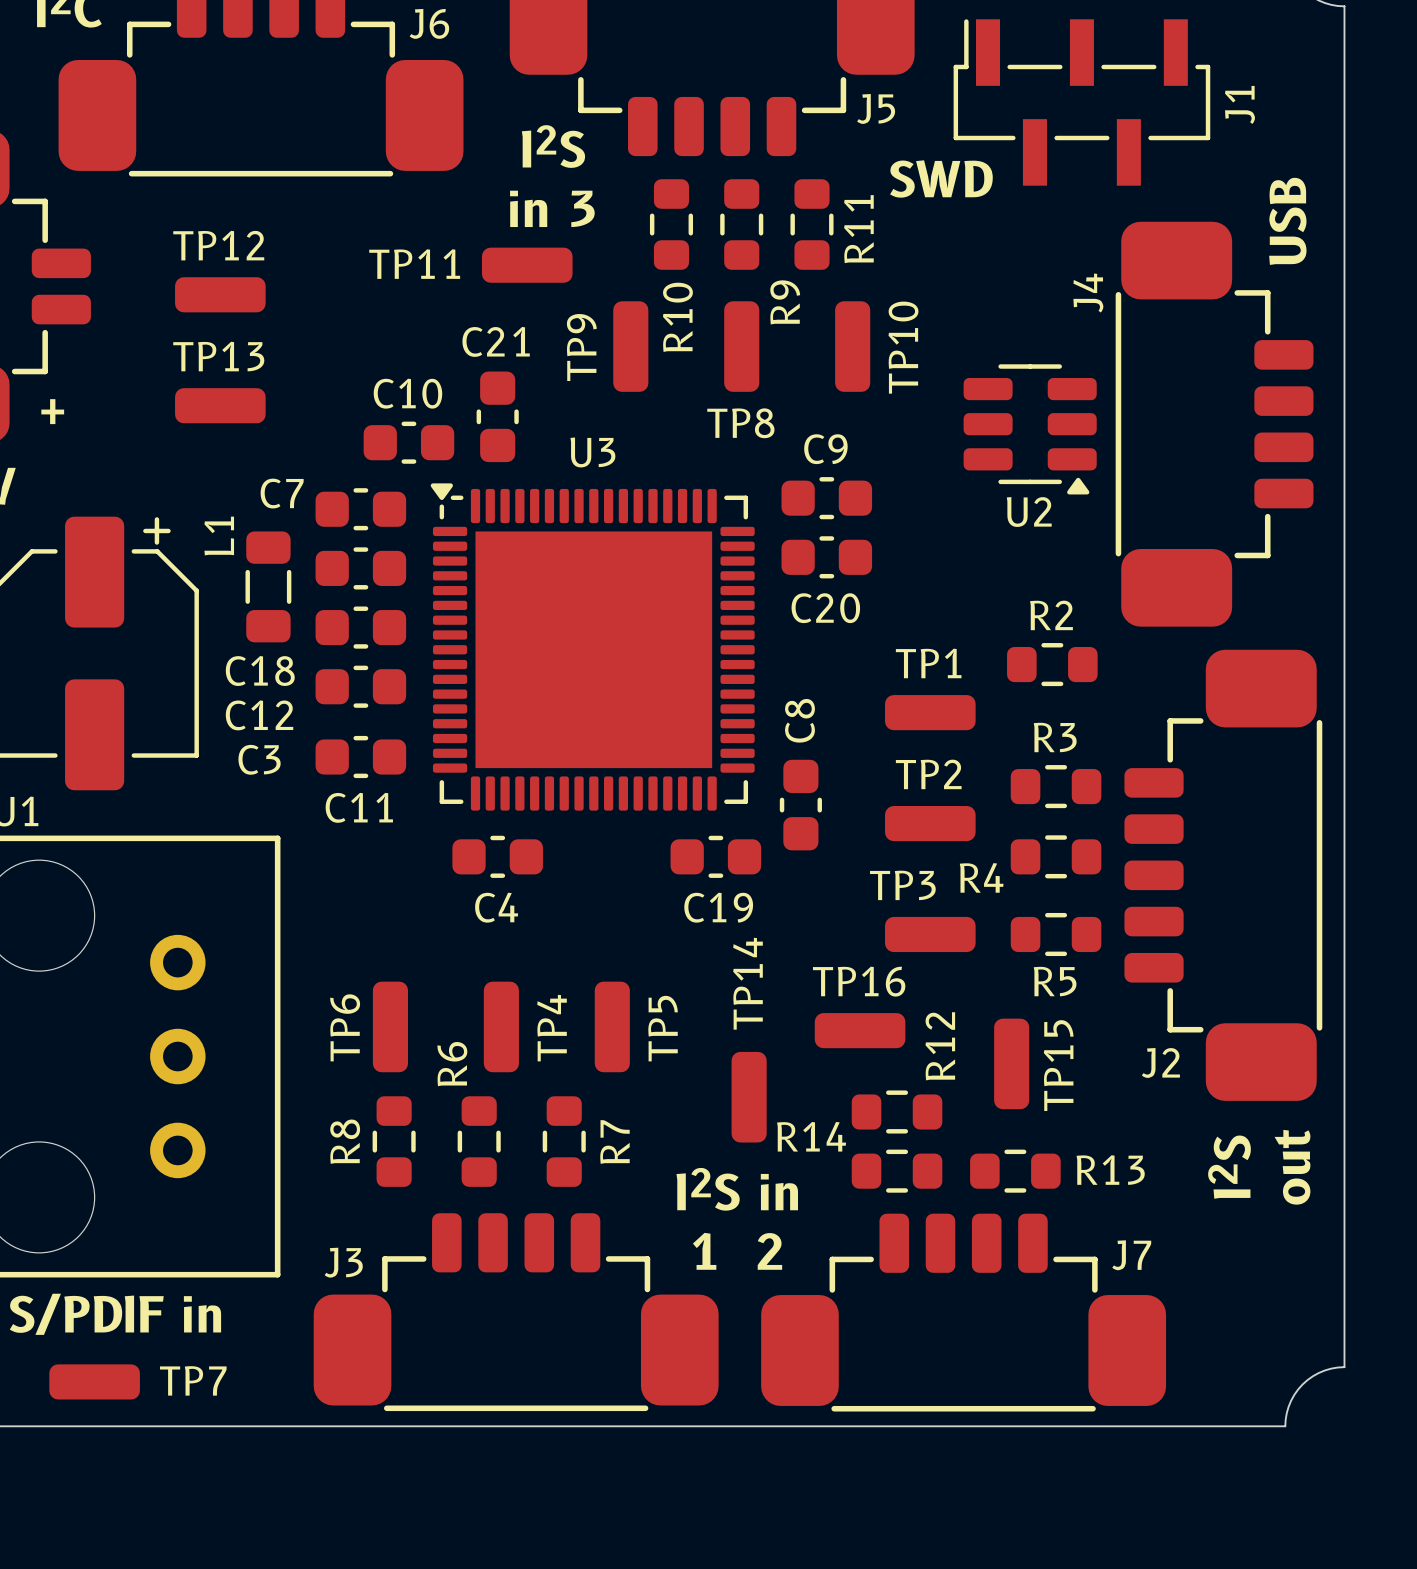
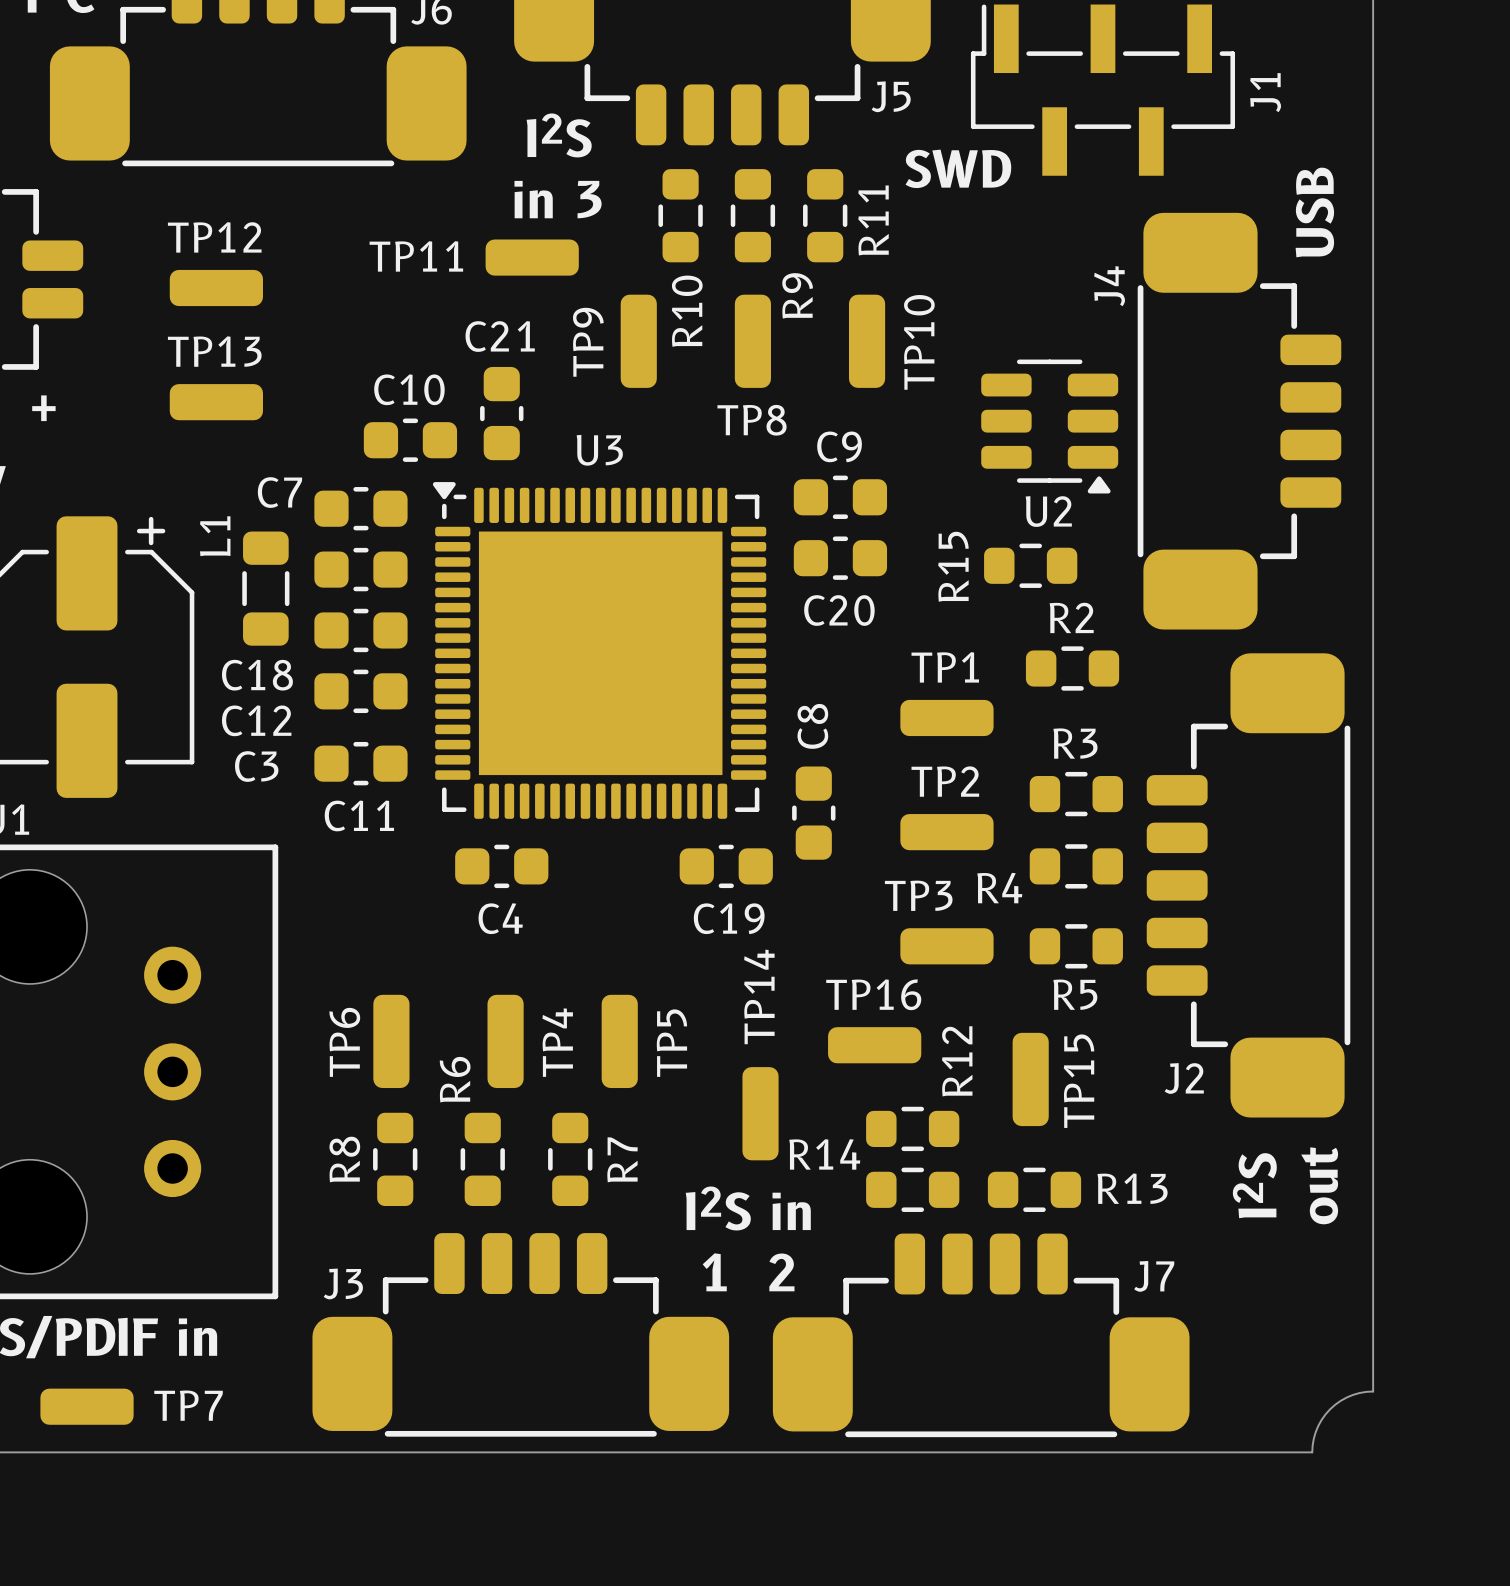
R15: none -> (1030, 565)

